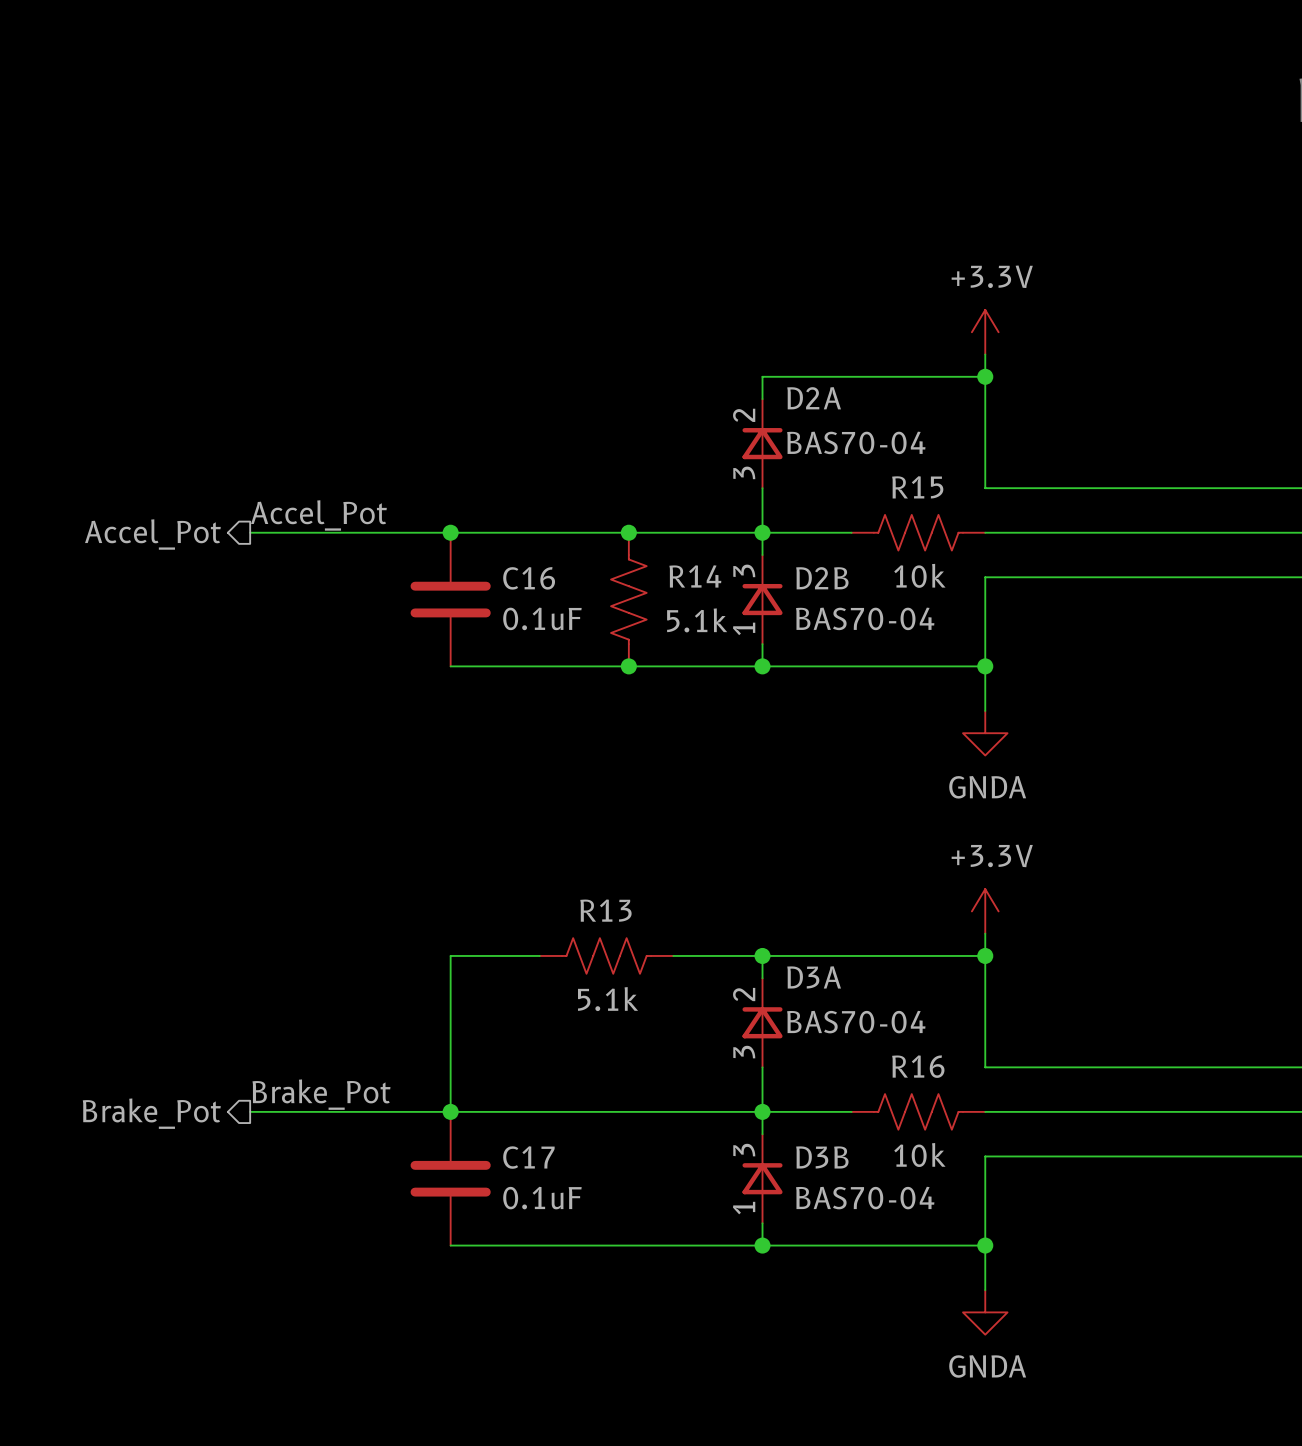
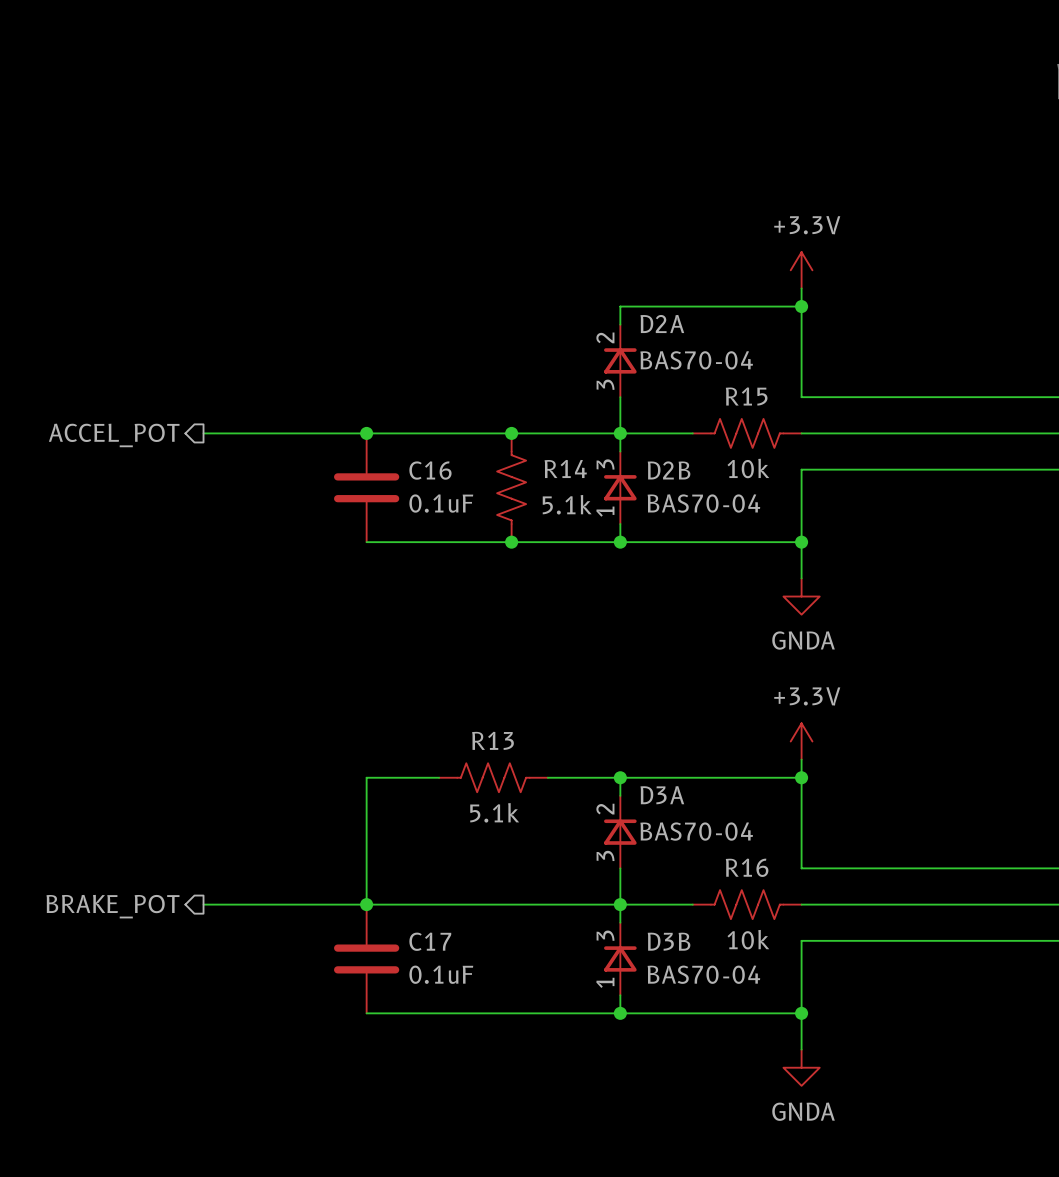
label: Accel_Pot (318, 515) -> none
hierarchical label: Accel_Pot (152, 534) -> ACCEL_POT (114, 435)
label: Brake_Pot (321, 1094) -> none
hierarchical label: Brake_Pot (151, 1113) -> BRAKE_POT (112, 906)

